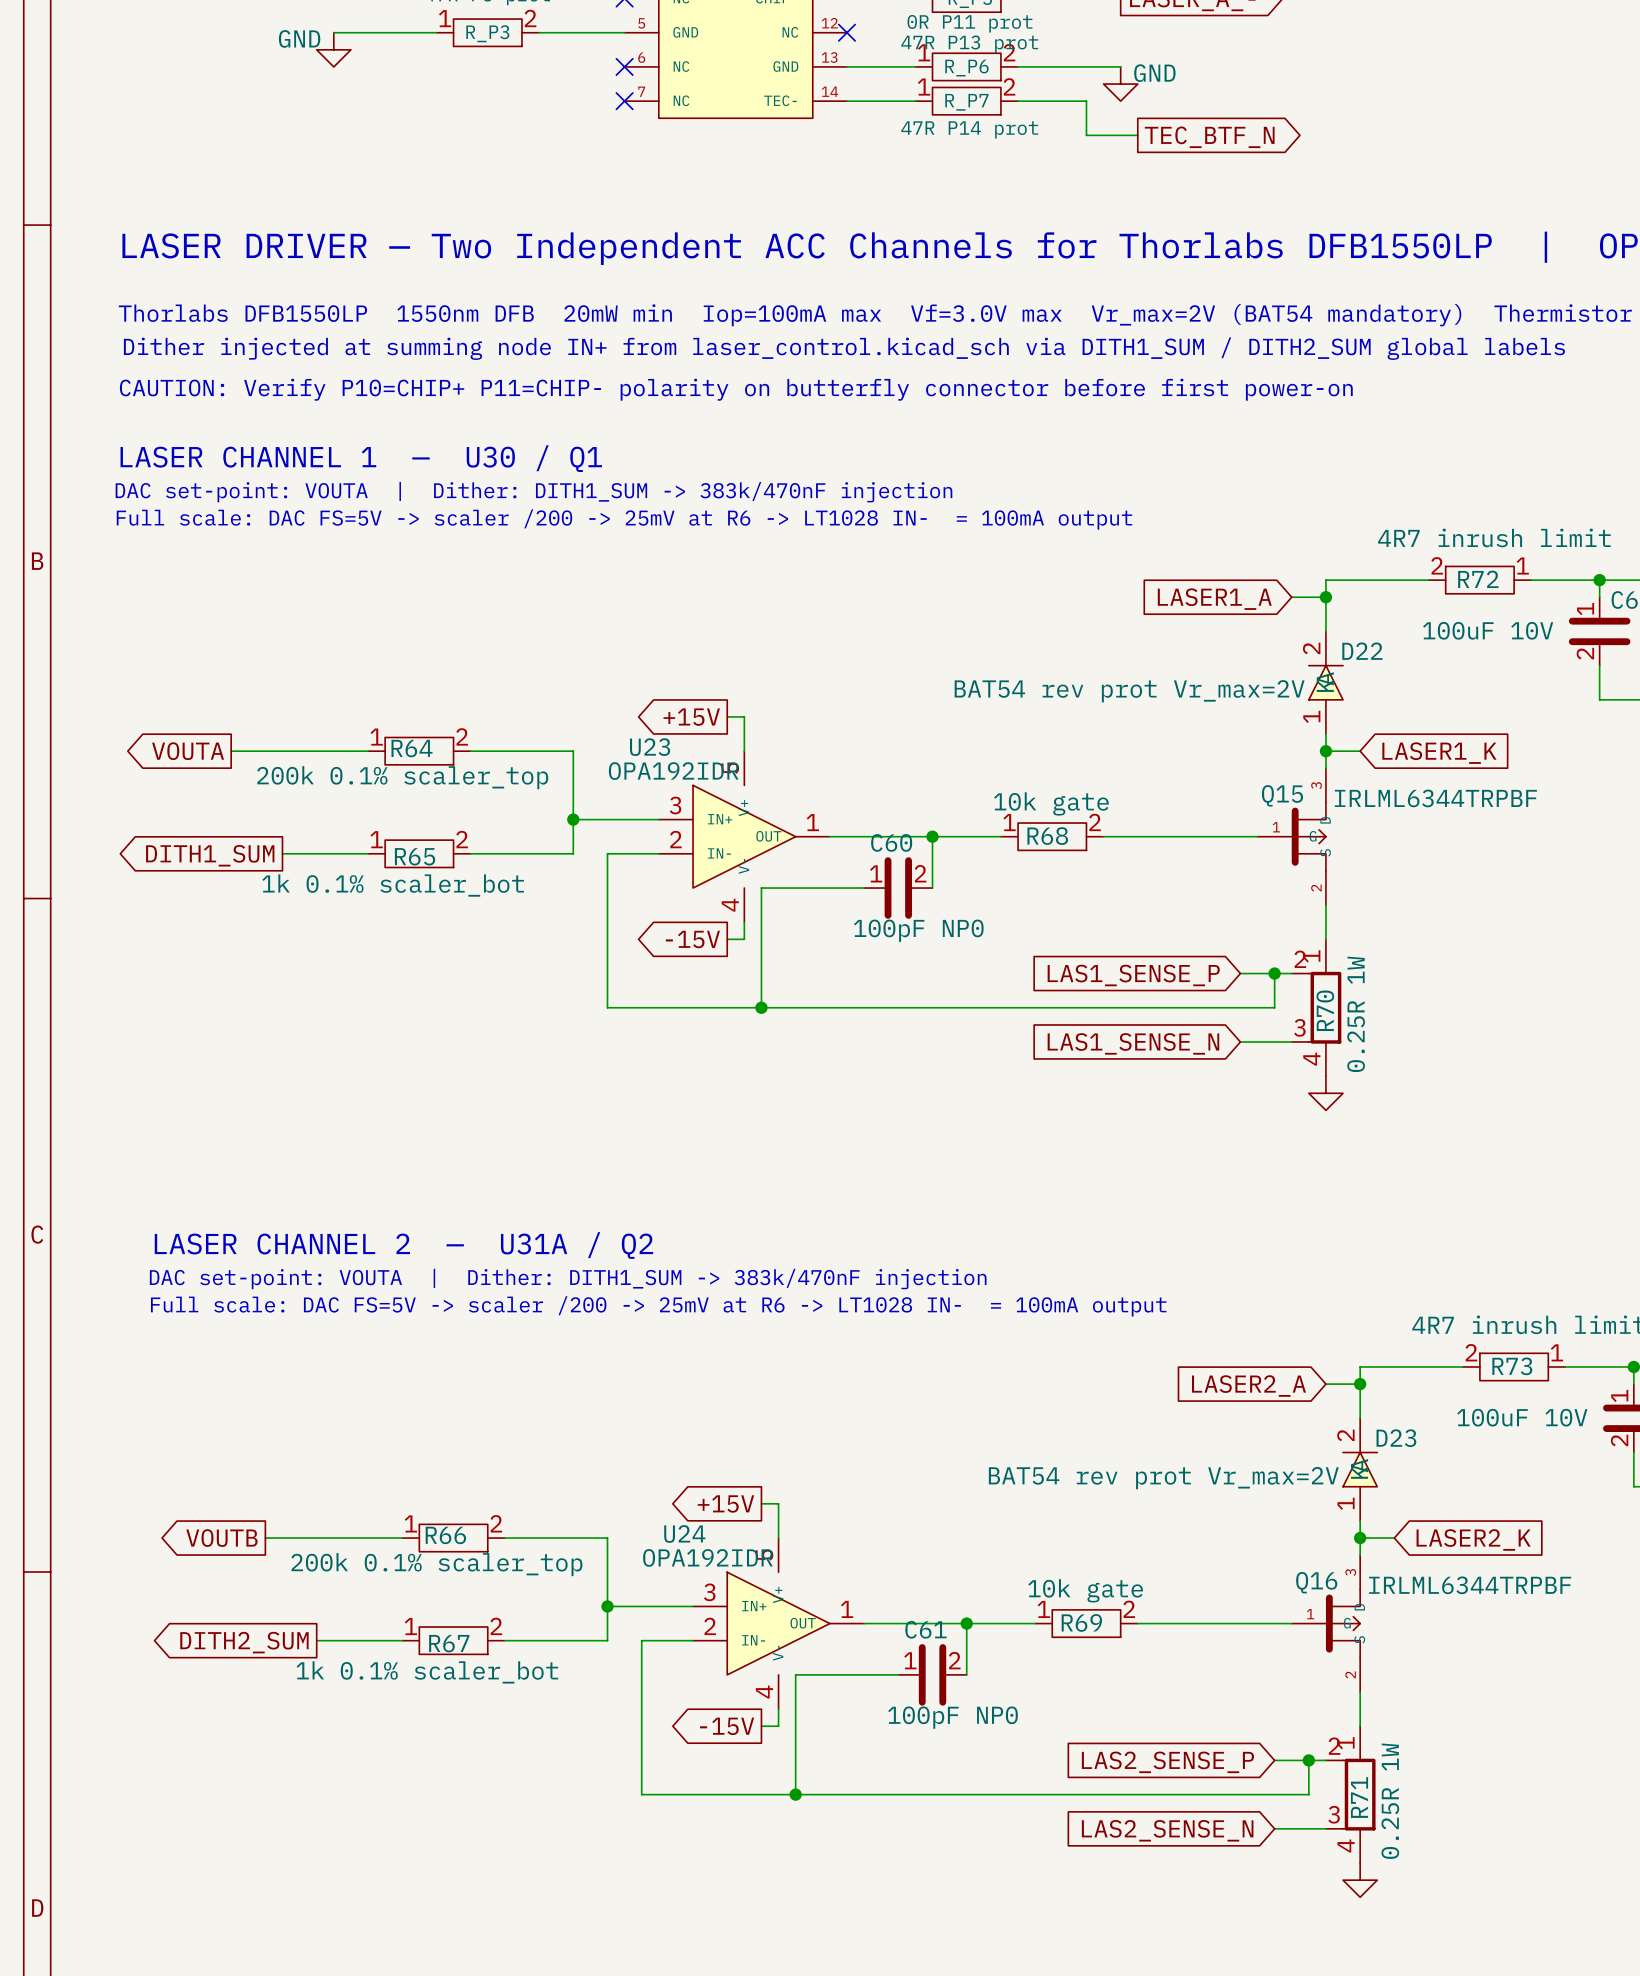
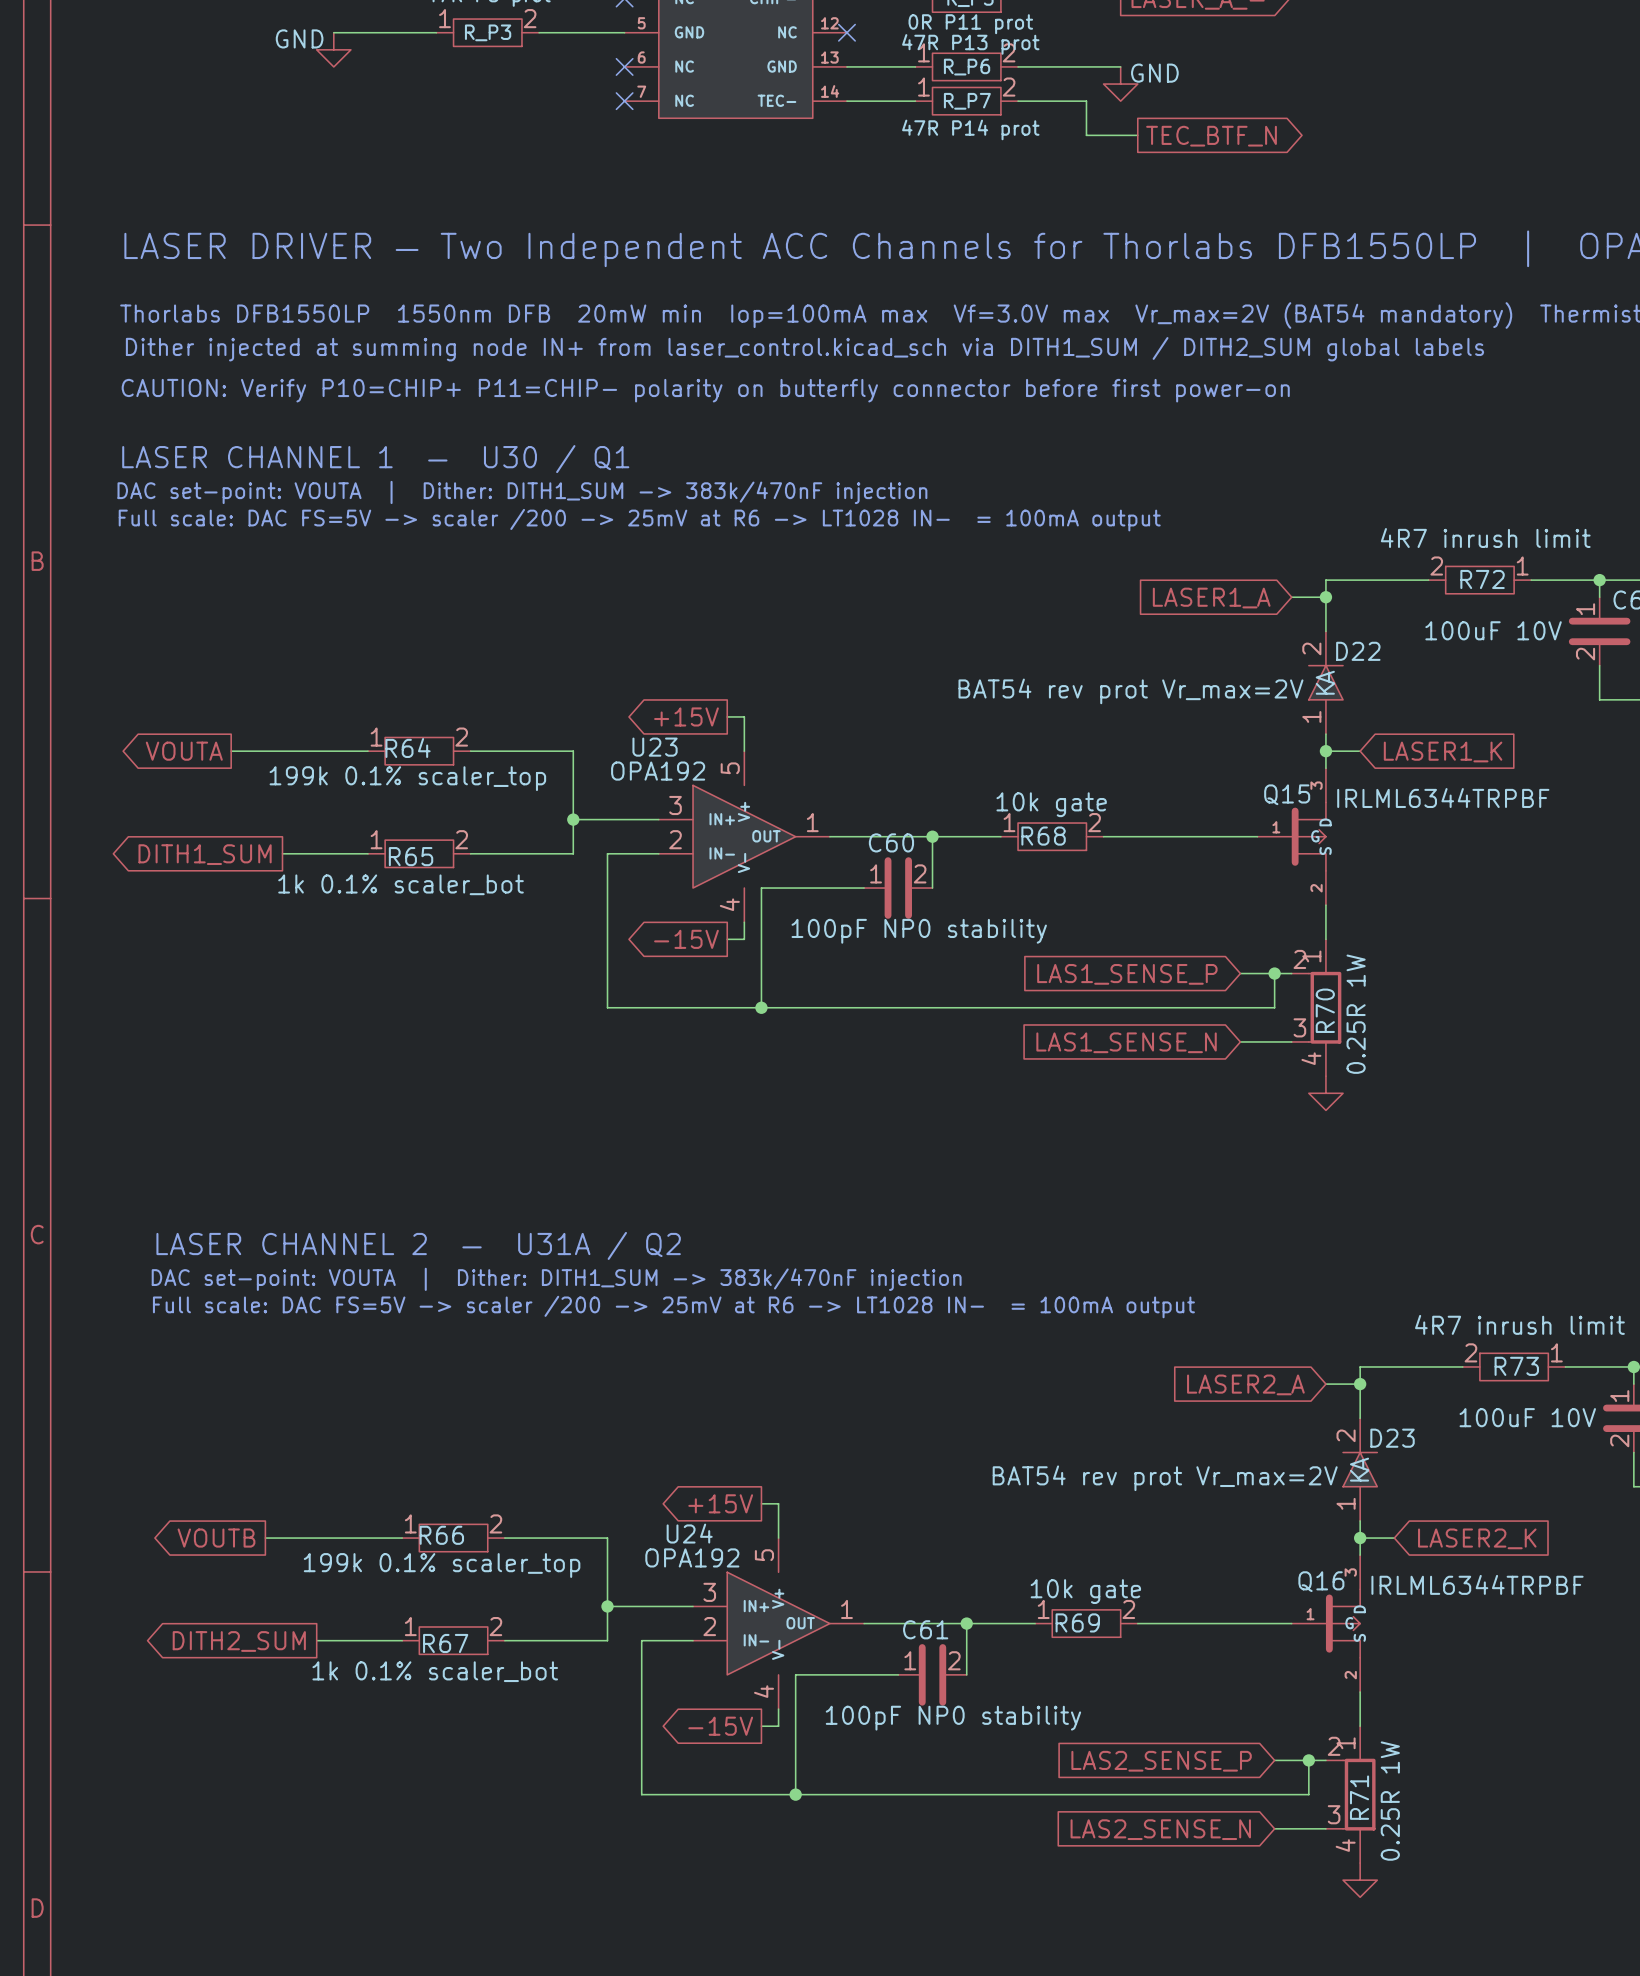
U23 value: OPA192IDR (673, 771) -> OPA192 (658, 771)
R64 value: 200k 0.1% scaler_top (402, 777) -> 199k 0.1% scaler_top (407, 778)
C60 value: 100pF NP0 (918, 930) -> 100pF NP0 stability (919, 931)
U24 value: OPA192IDR (707, 1557) -> OPA192 (692, 1557)
R66 value: 200k 0.1% scaler_top (436, 1564) -> 199k 0.1% scaler_top (442, 1565)
C61 value: 100pF NP0 (953, 1717) -> 100pF NP0 stability (953, 1718)

